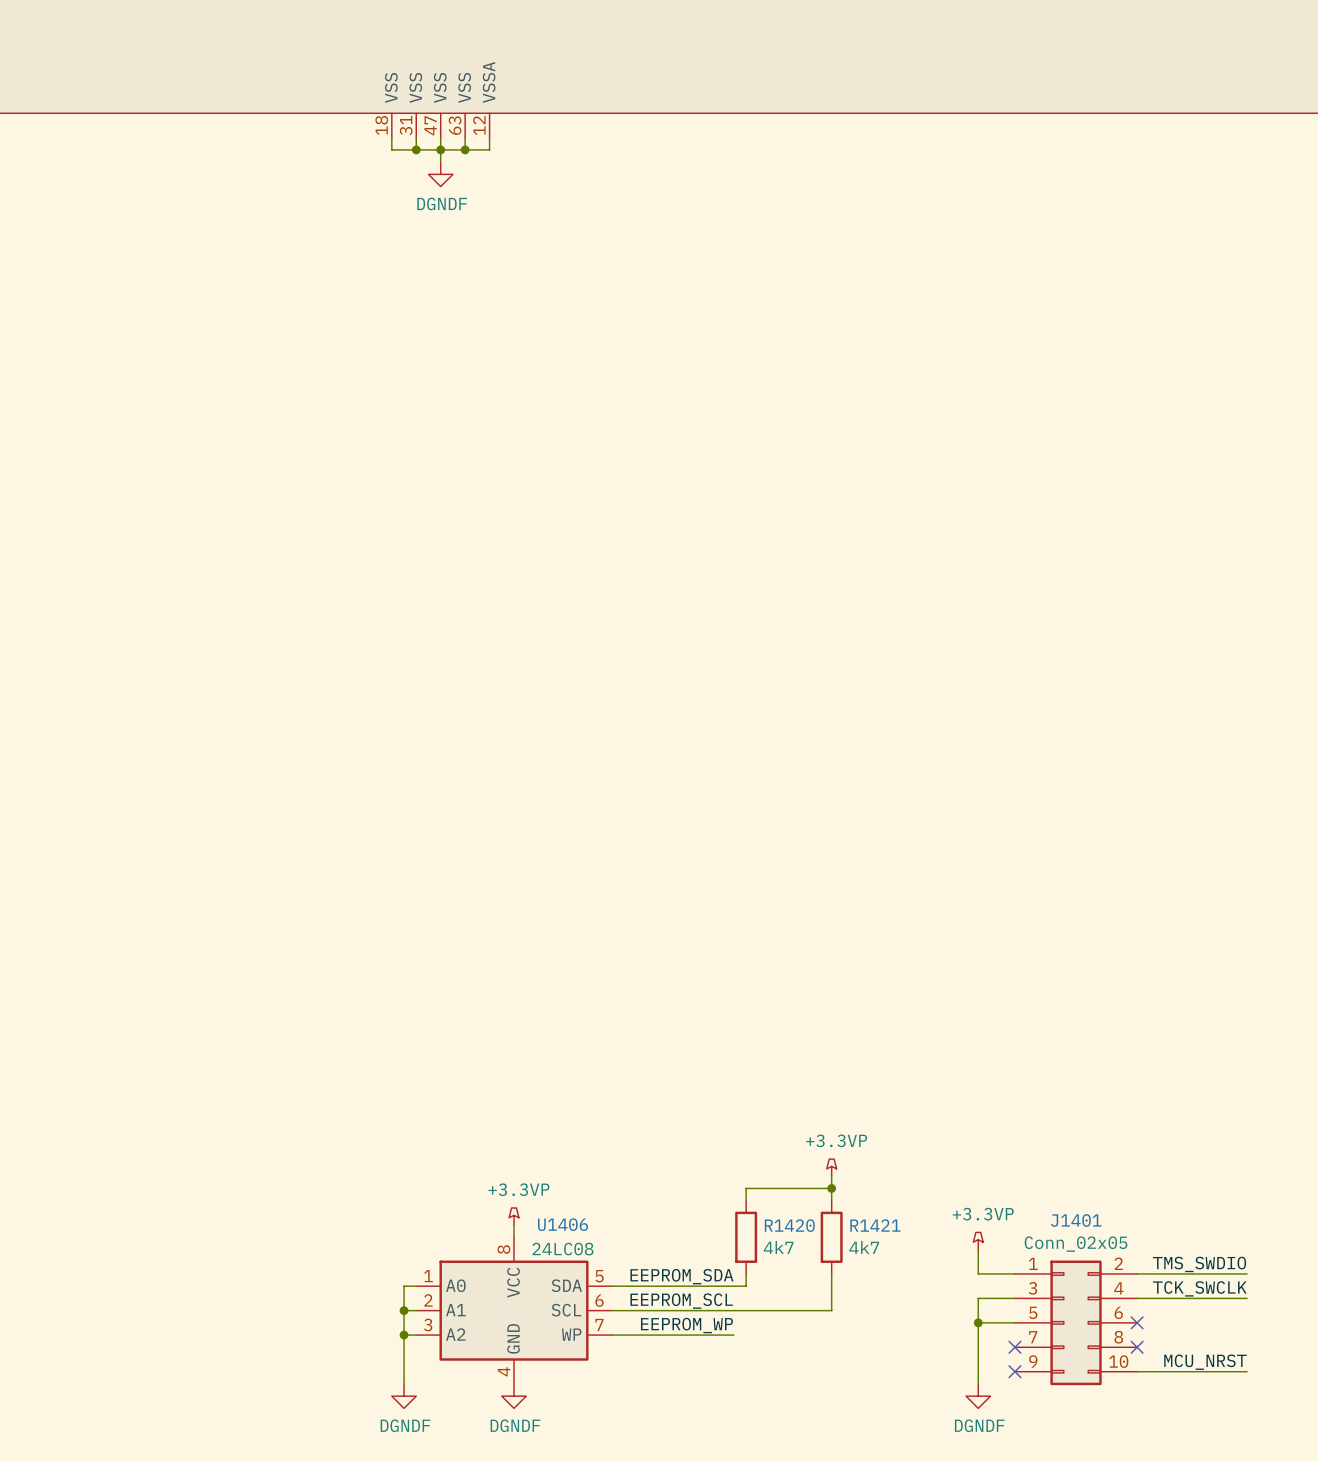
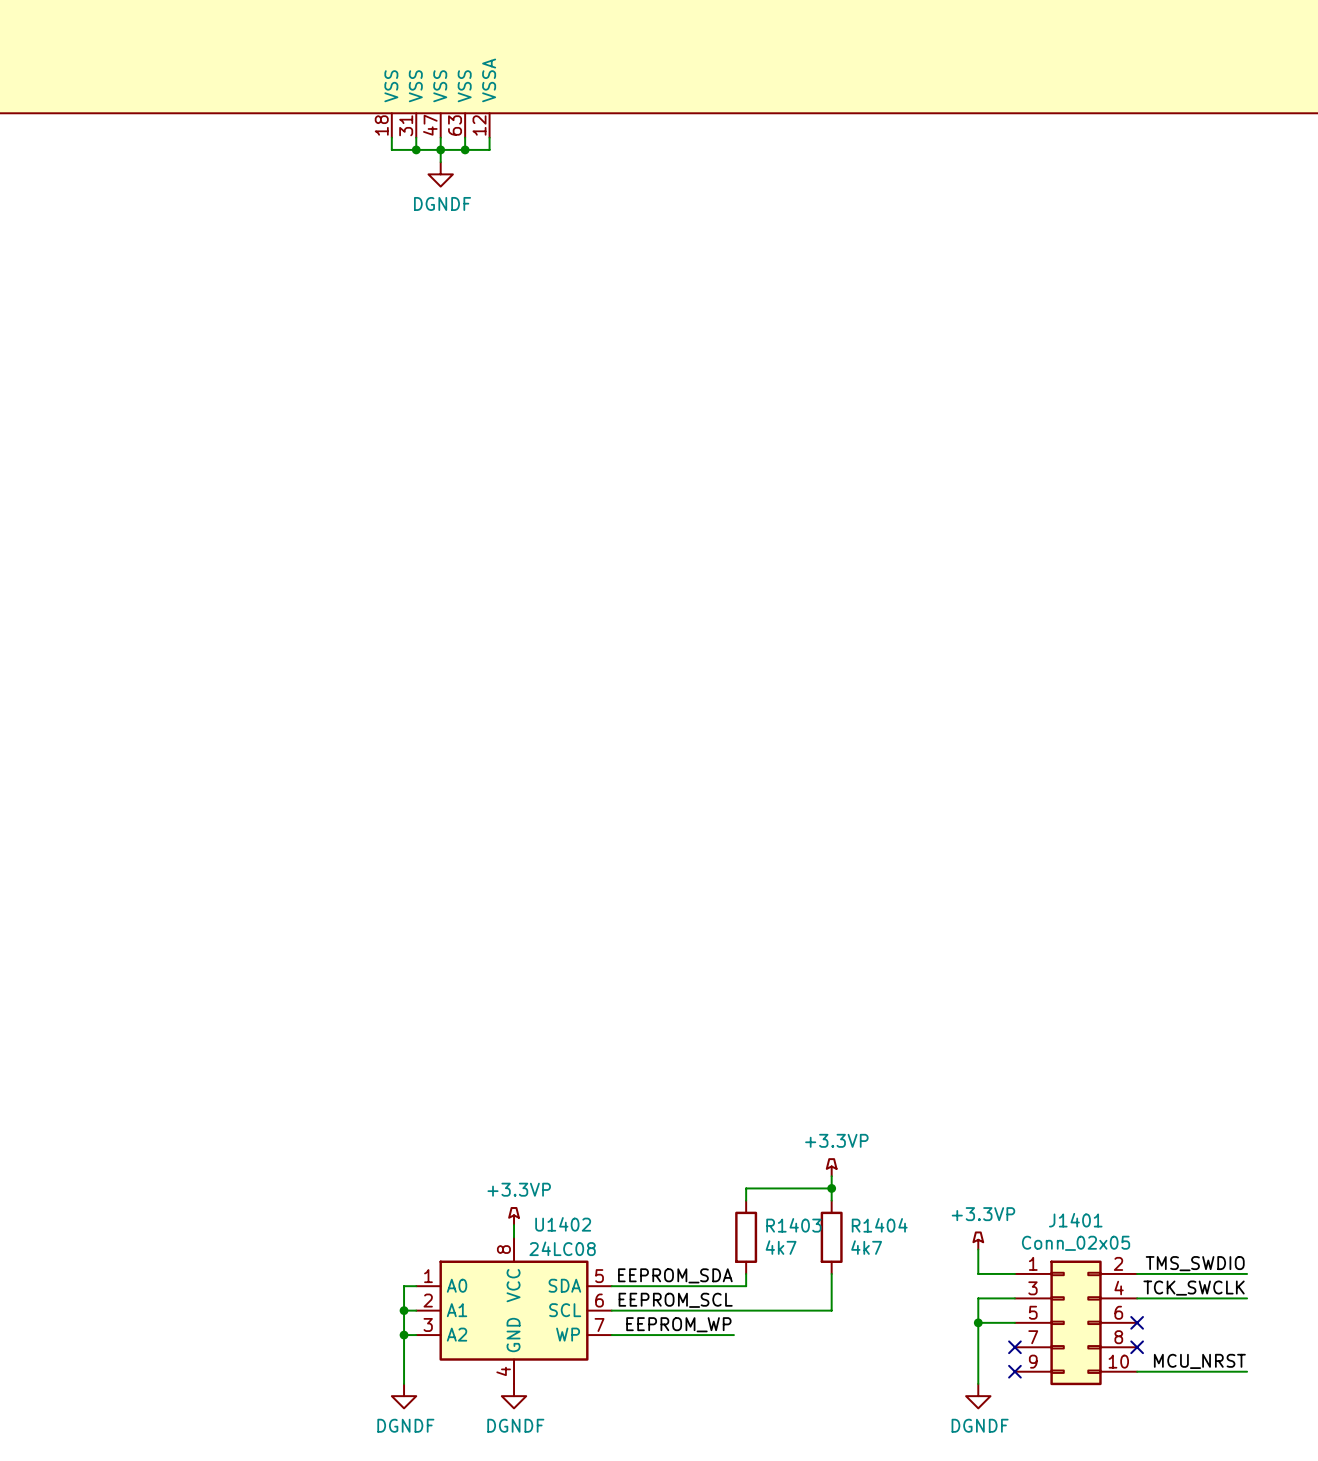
U1406 name: U1406 (563, 1224) -> U1402 (563, 1224)
R1420 name: R1420 (789, 1225) -> R1403 (793, 1225)
R1421 name: R1421 (875, 1225) -> R1404 (879, 1225)

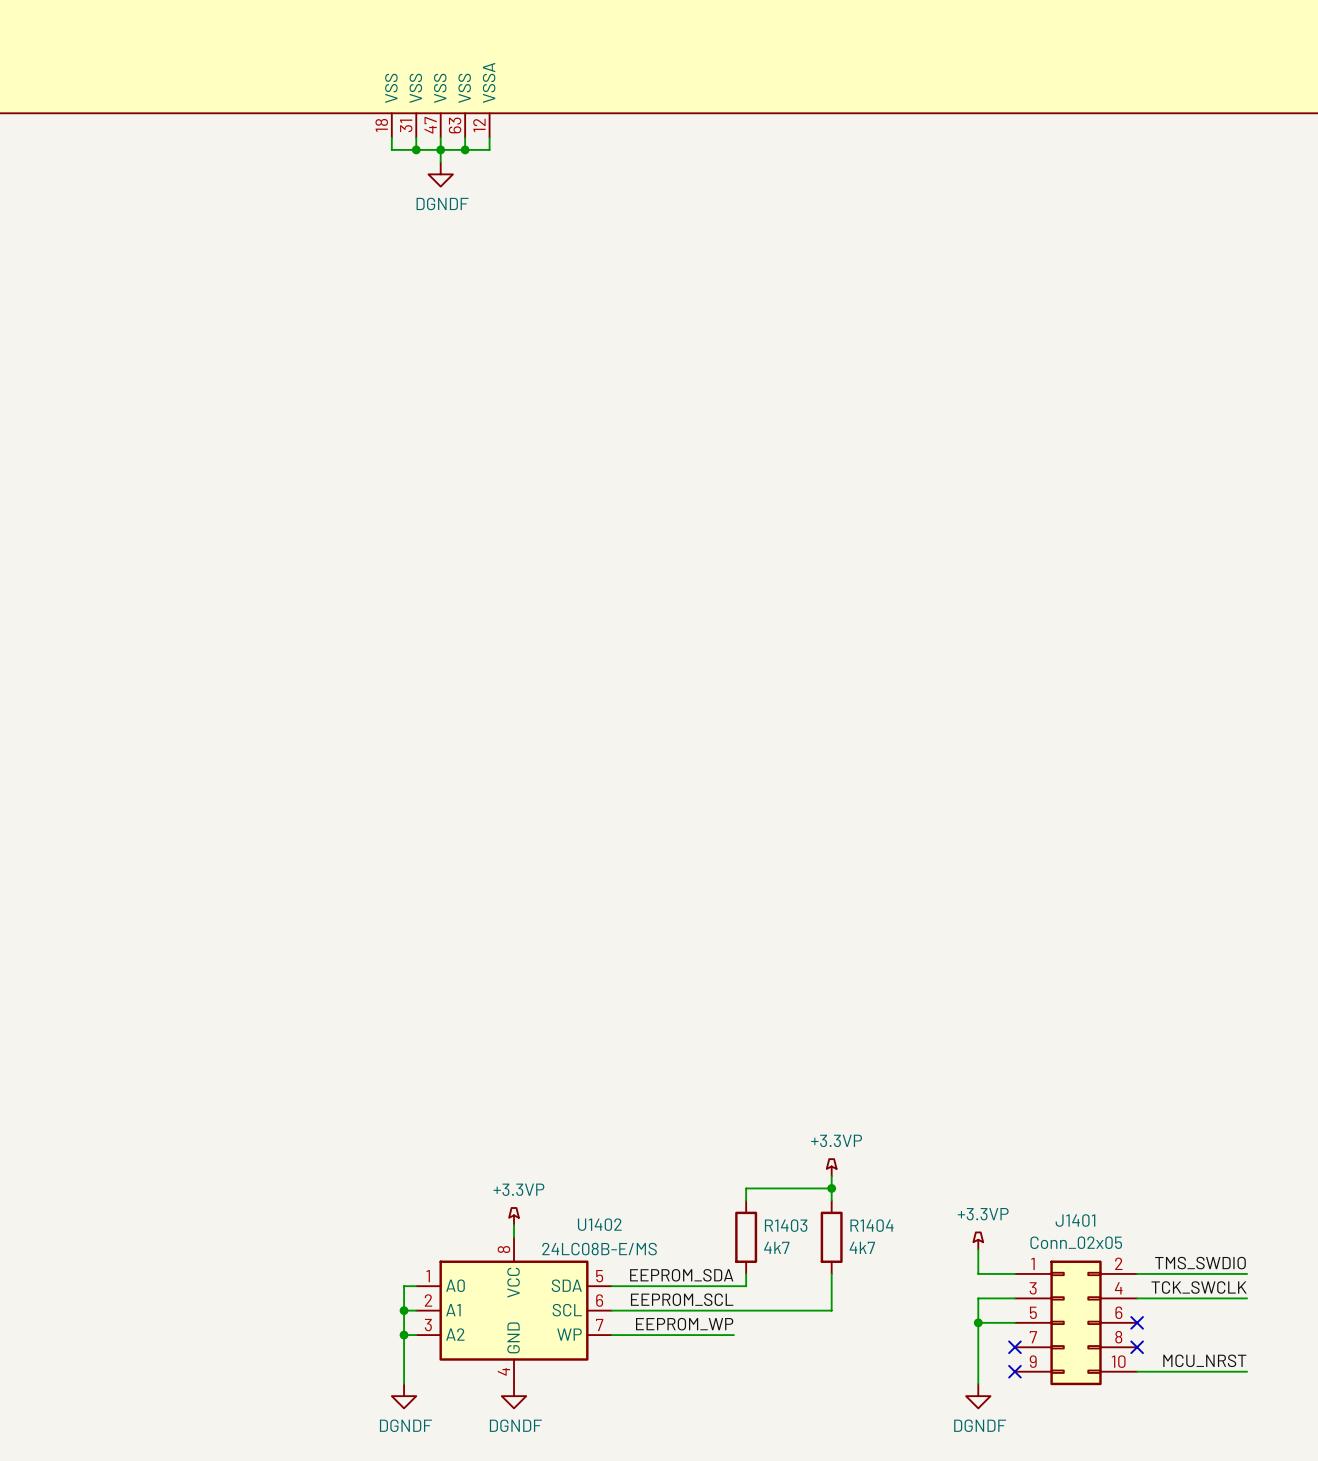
U1402 name position: U1402 (563, 1224) -> U1402 (599, 1224)
U1402 value: 24LC08 (562, 1248) -> 24LC08B-E/MS (599, 1249)

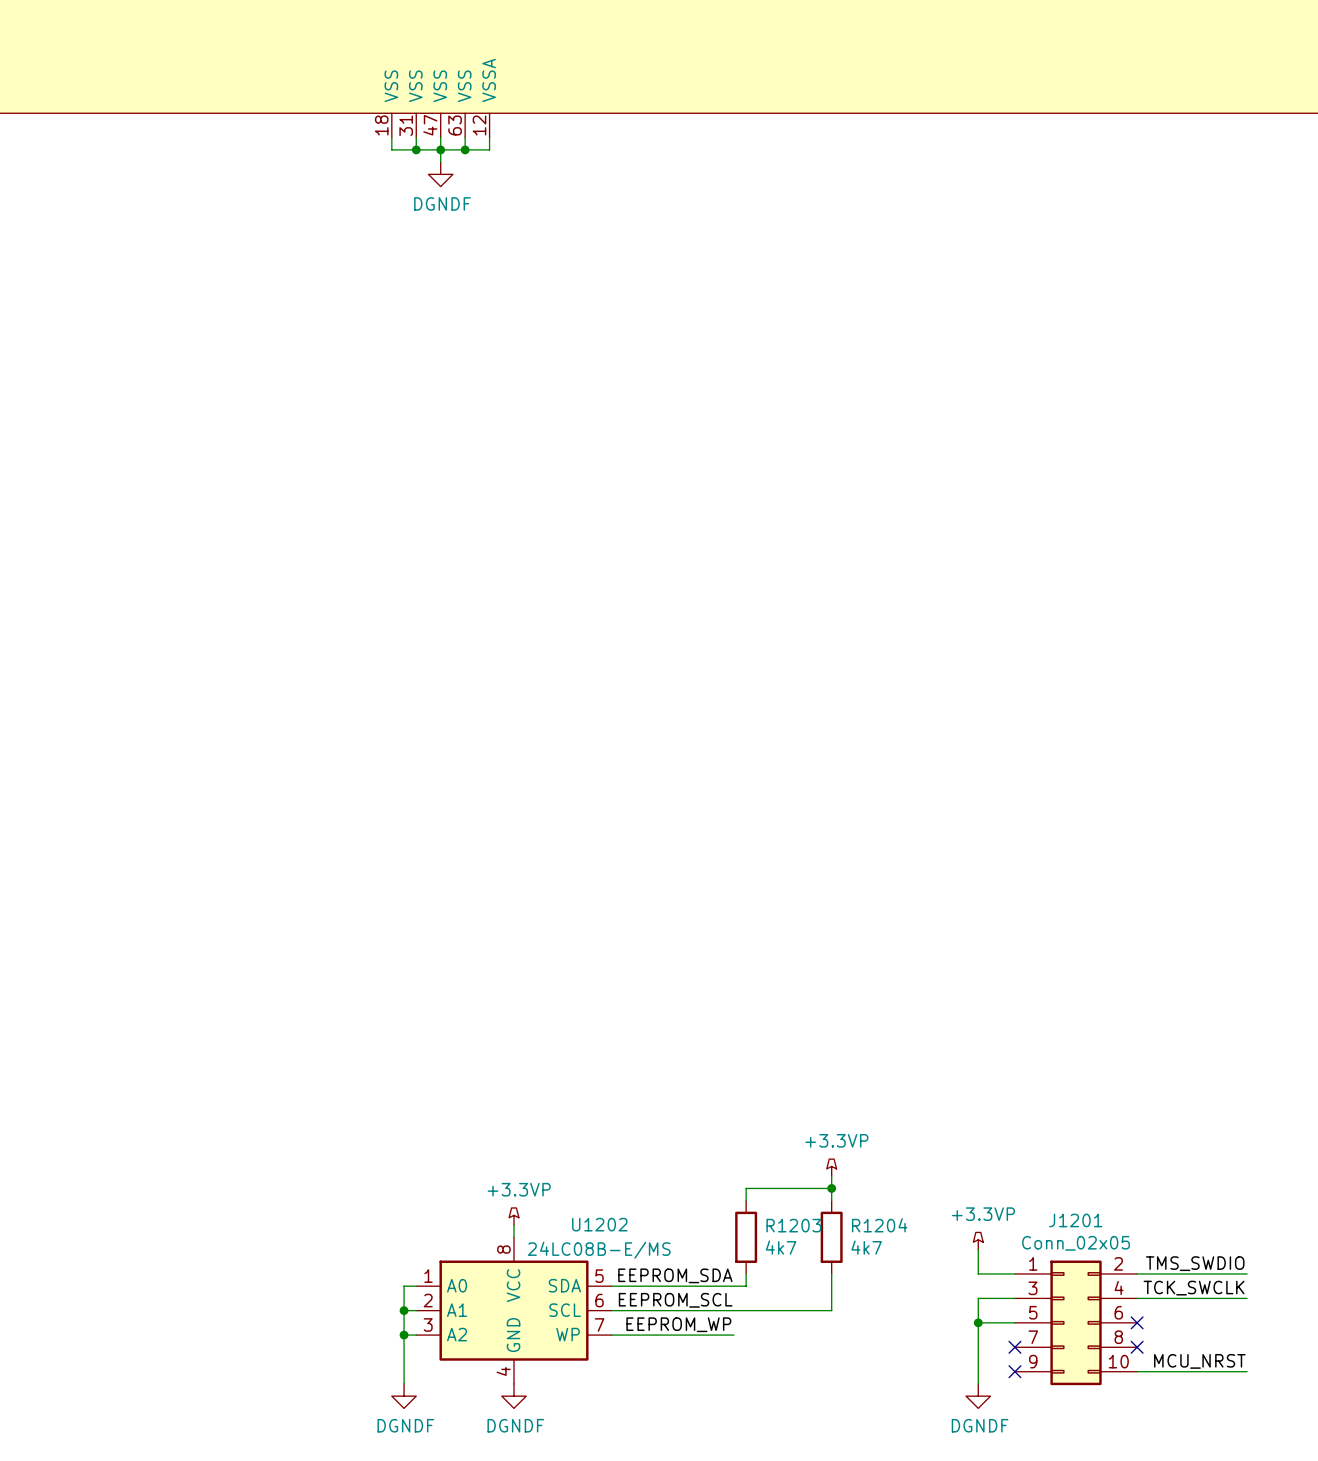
J1401 name: J1401 (1075, 1220) -> J1201 (1075, 1220)
U1402 name: U1402 (599, 1224) -> U1202 (599, 1224)
R1403 name: R1403 (786, 1225) -> R1203 (793, 1225)
R1404 name: R1404 (872, 1225) -> R1204 (879, 1225)

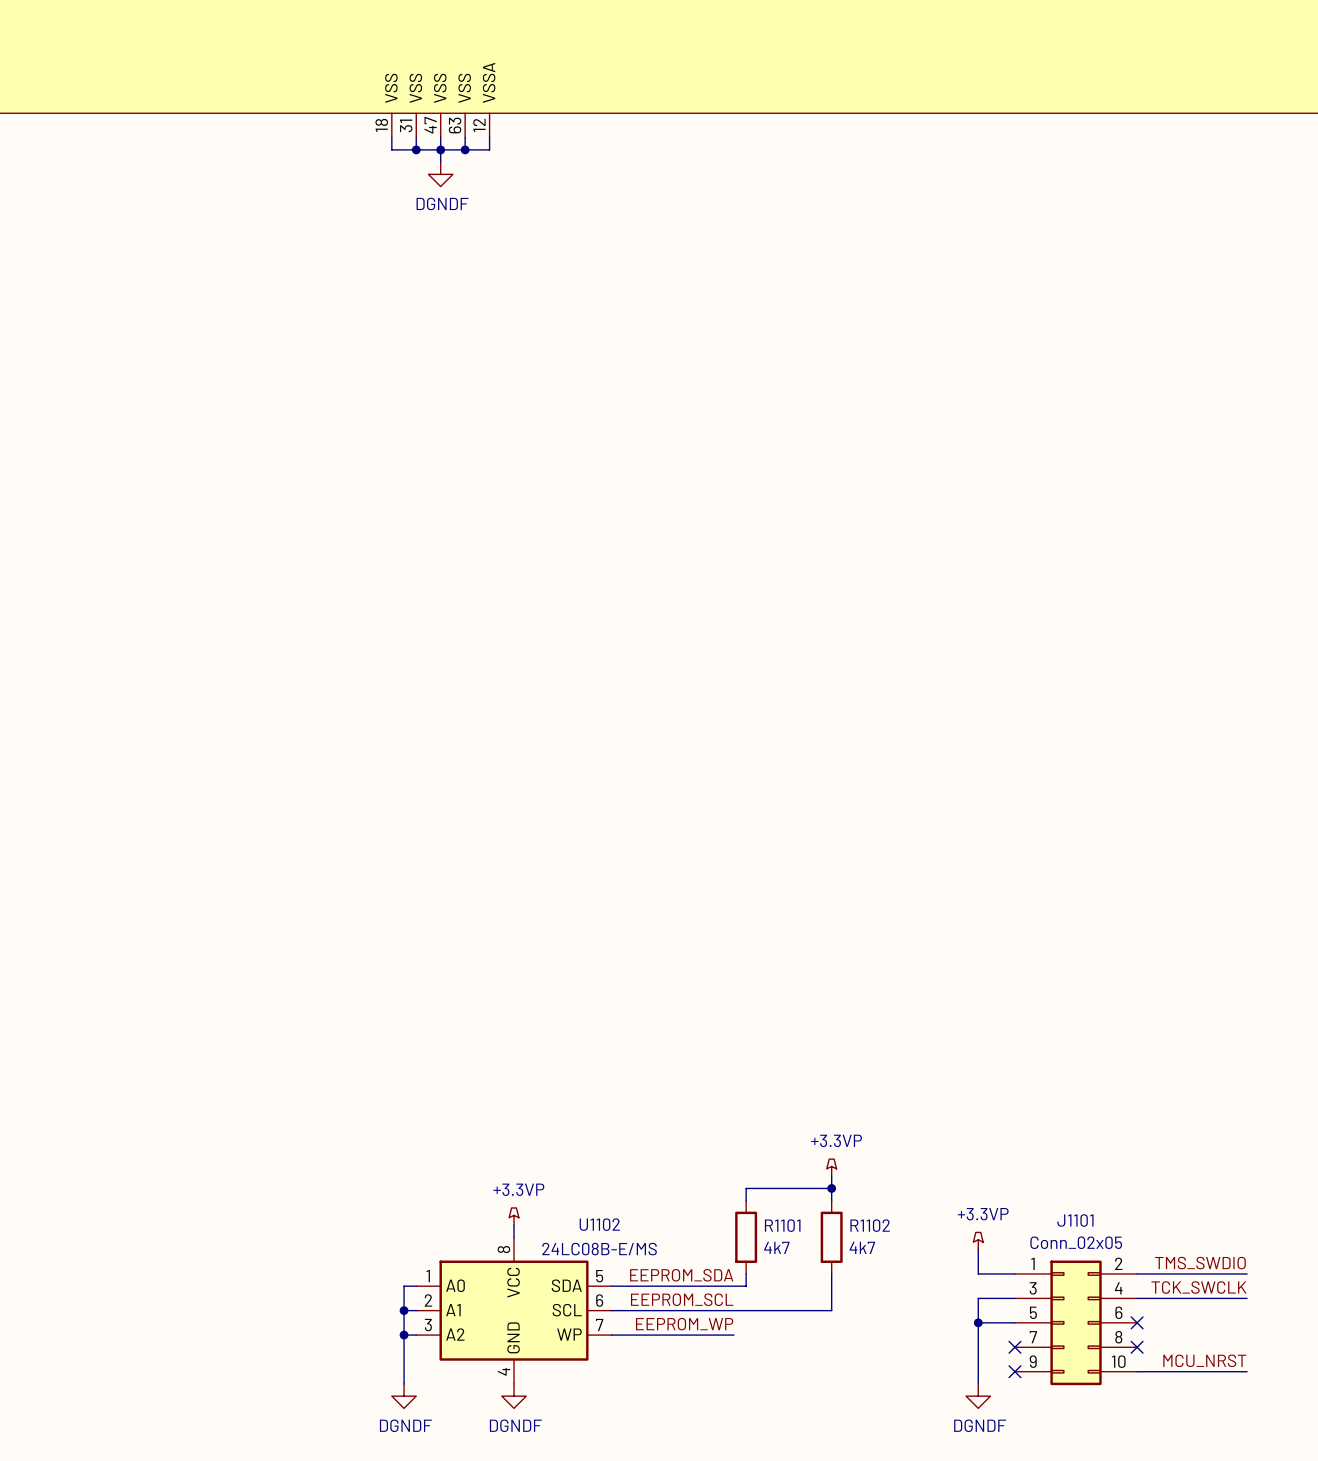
J1201 name: J1201 (1075, 1220) -> J1101 (1075, 1220)
U1202 name: U1202 (599, 1224) -> U1102 (599, 1224)
R1203 name: R1203 (793, 1225) -> R1101 (782, 1225)
R1204 name: R1204 (879, 1225) -> R1102 (870, 1225)

